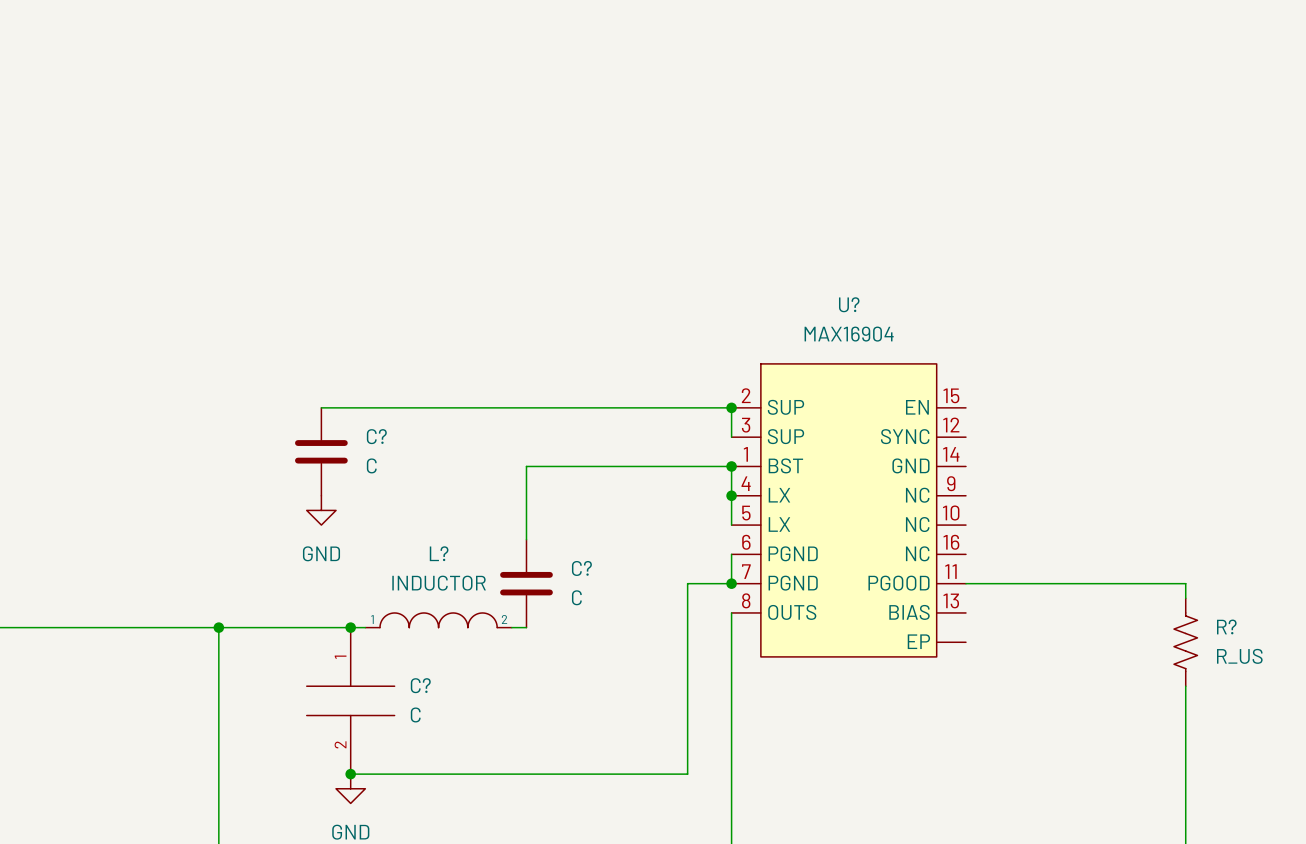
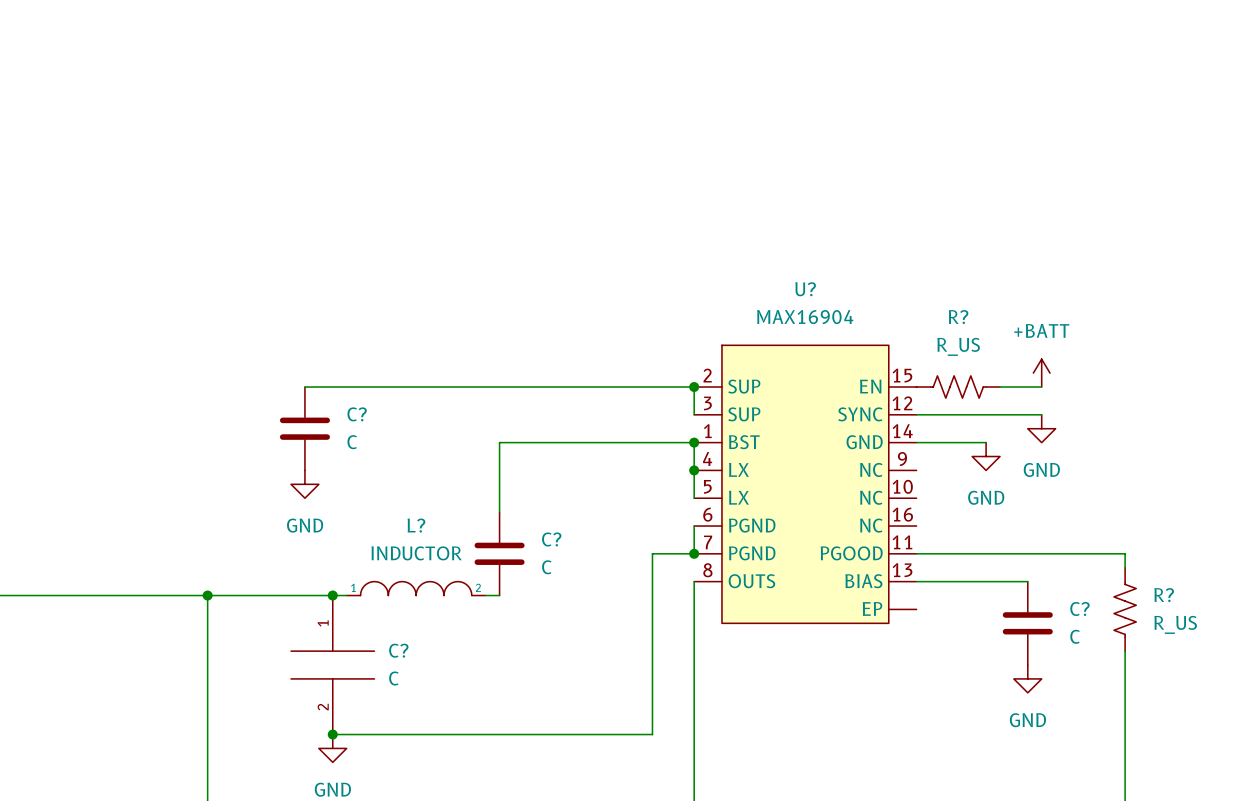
power symbol: none -> +BATT (1041, 373)
R?: none -> R_US (958, 387)
wire: none -> (999, 387) (1041, 387)
wire: none -> (916, 414) (1041, 414)
power symbol: none -> GND (1041, 428)
wire: none -> (916, 442) (986, 442)
power symbol: none -> GND (986, 456)
wire: none -> (916, 581) (1027, 581)
C?: none -> C (1027, 623)
power symbol: none -> GND (1027, 678)

